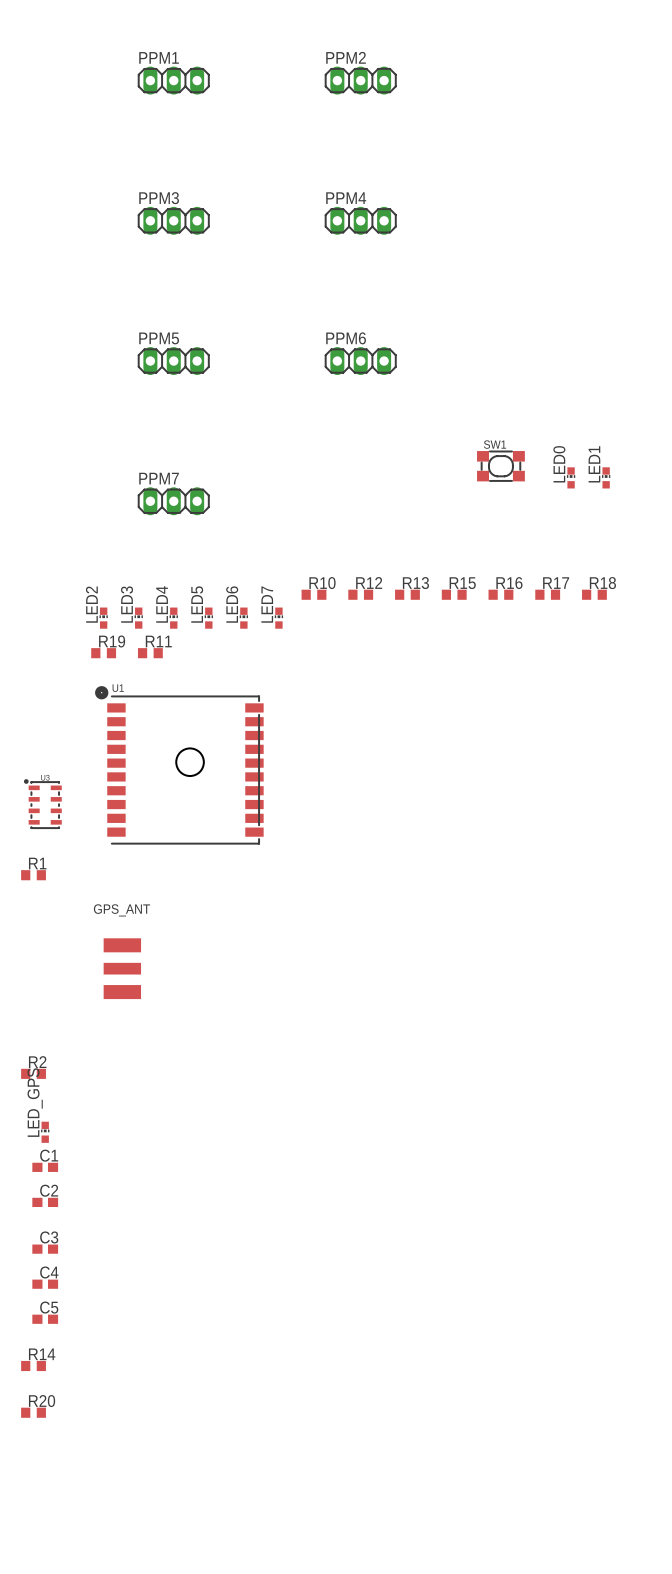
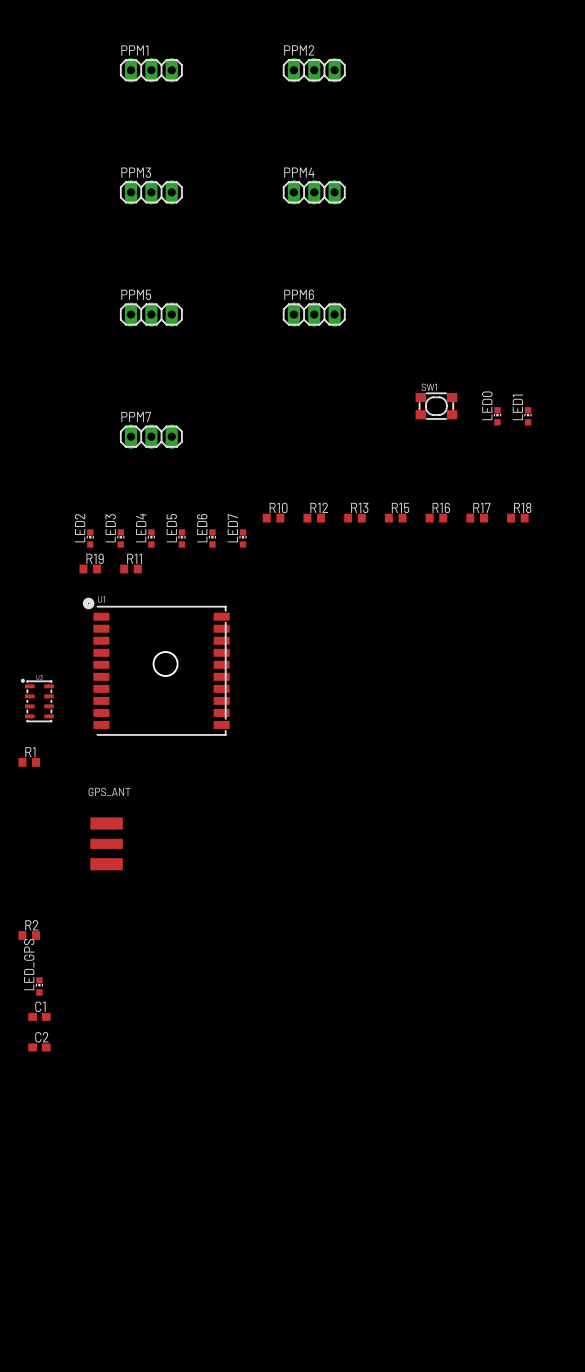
C3: (45, 1249) -> none
C4: (45, 1284) -> none
C5: (45, 1319) -> none
R14: (33, 1365) -> none
R20: (33, 1412) -> none

